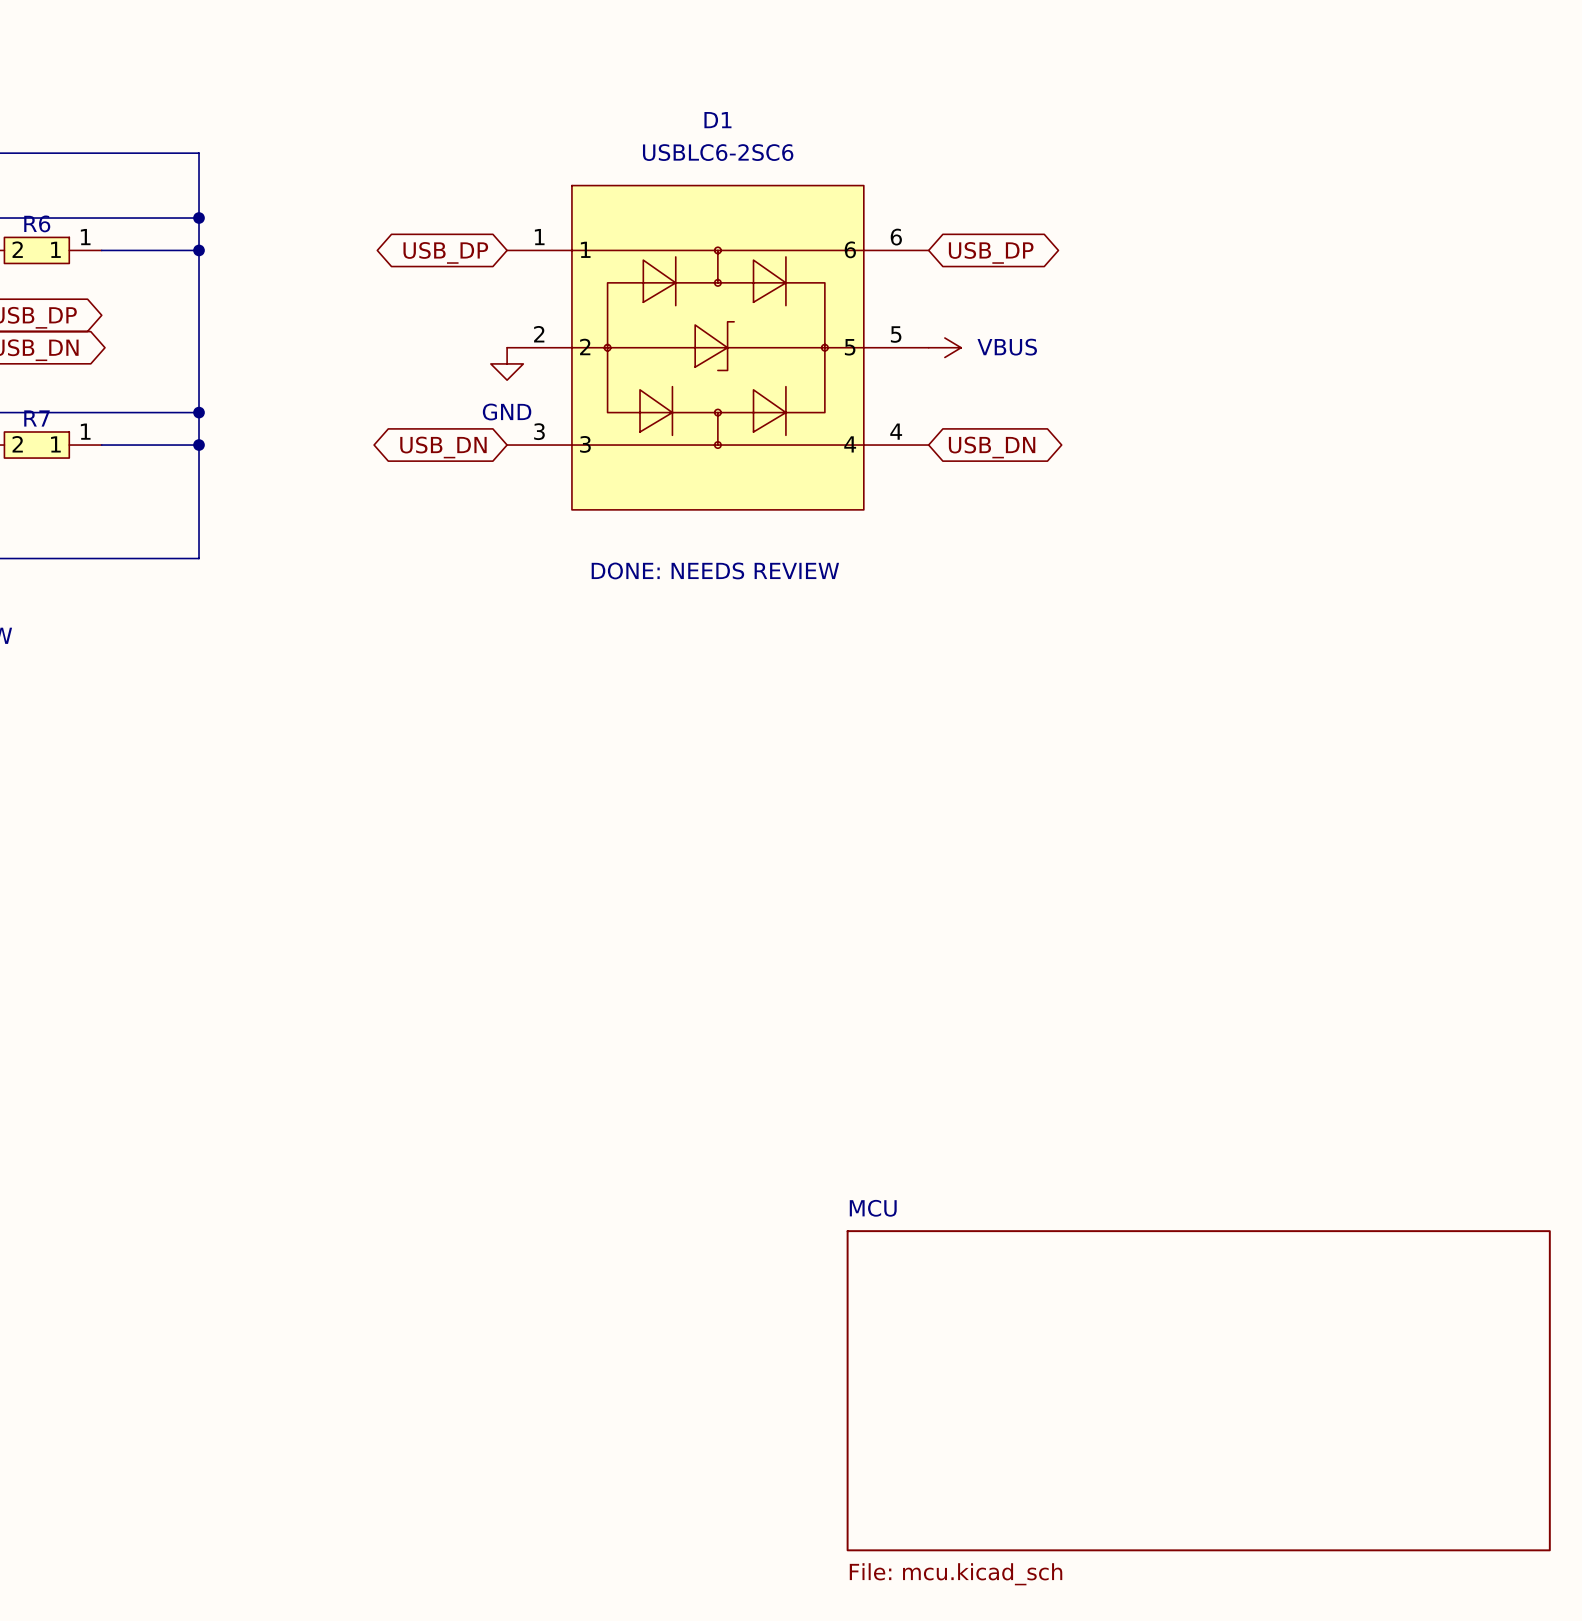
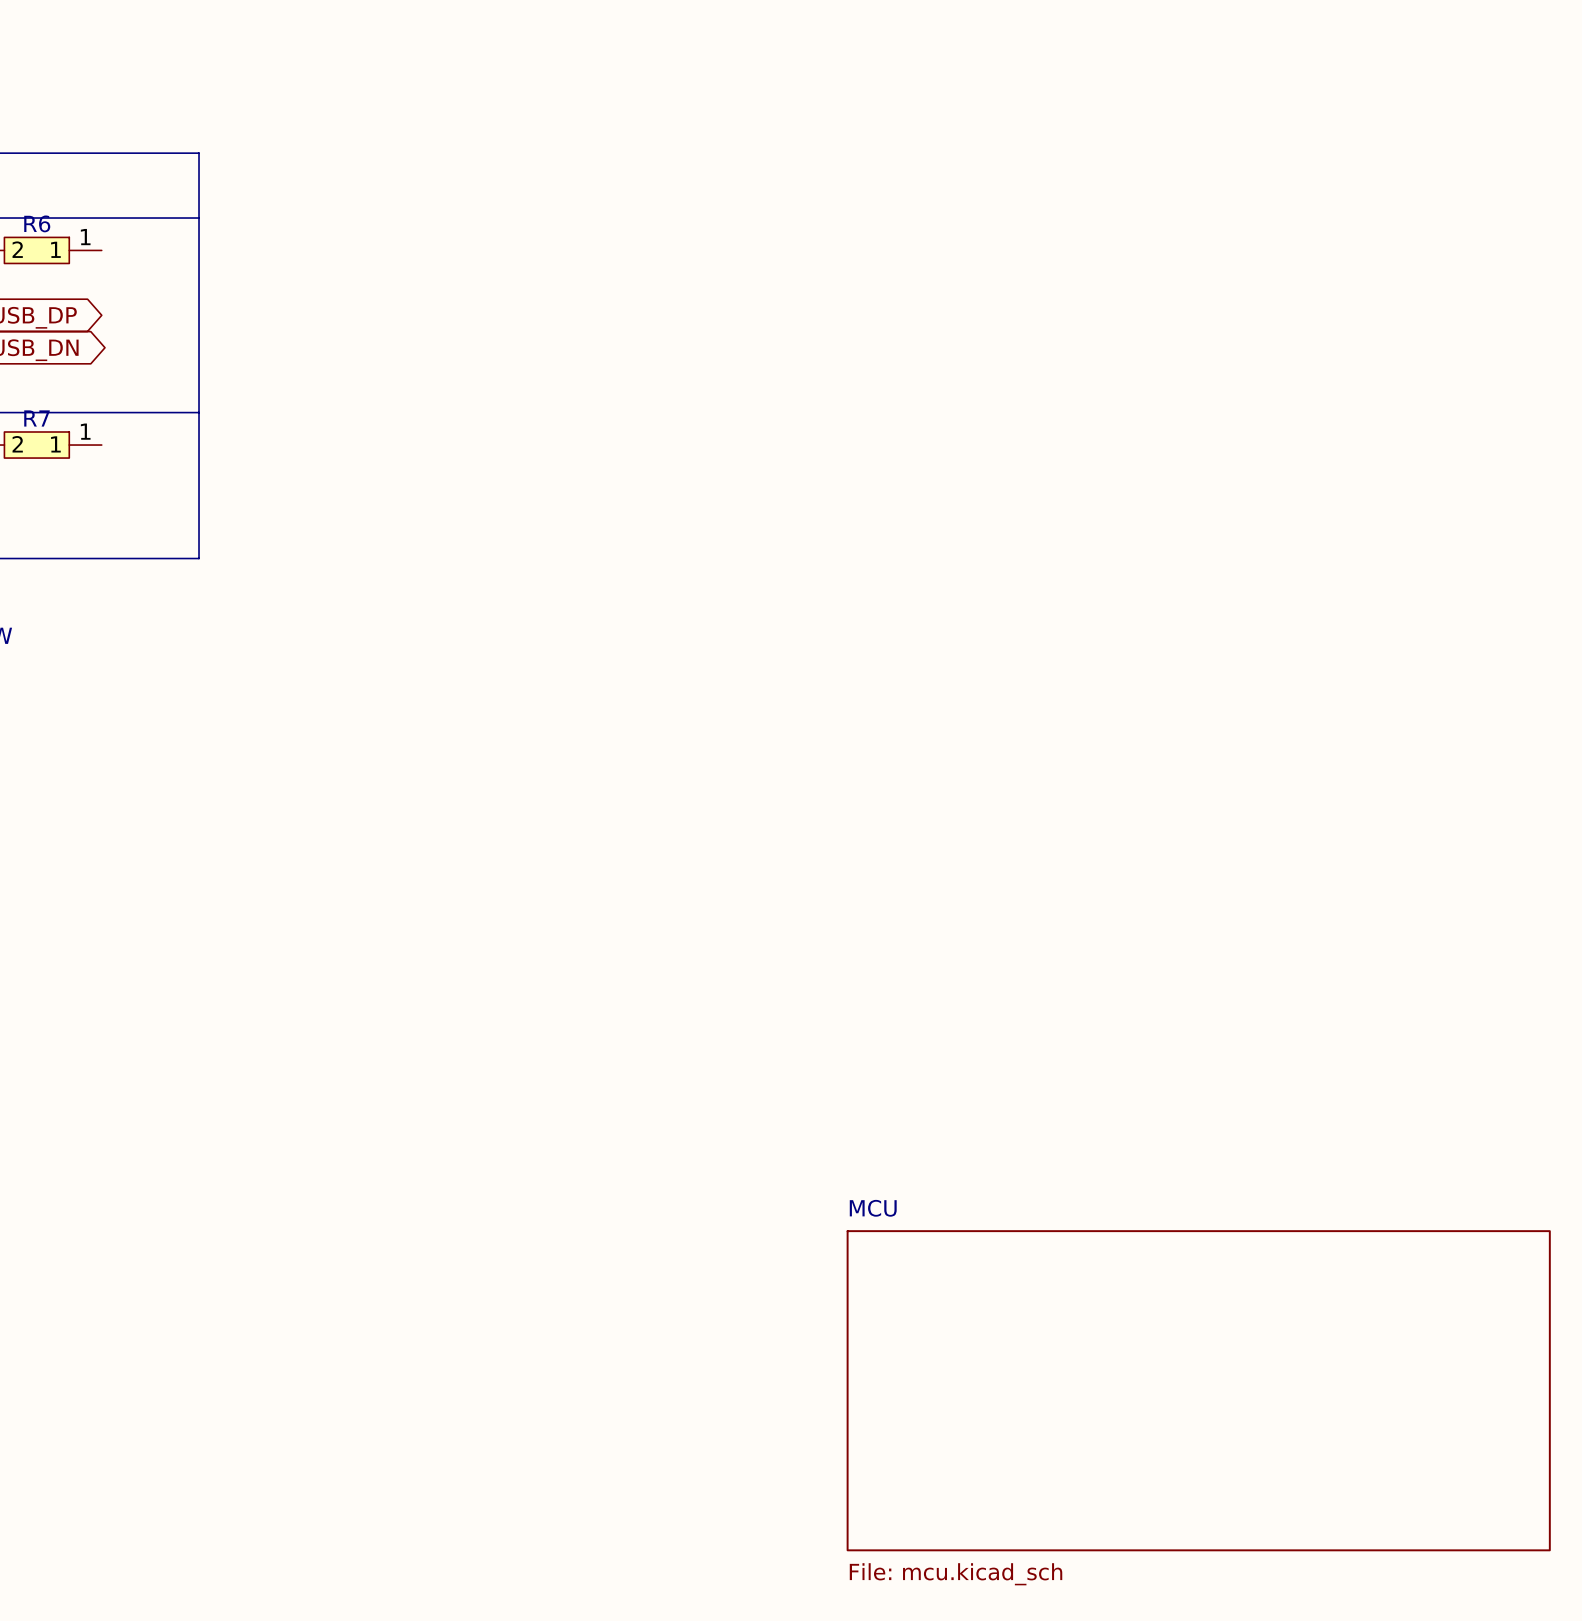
junction: (199, 218) -> none
wire: (101, 250) (199, 250) -> none
junction: (199, 250) -> none
global label: USB_DP (445, 252) -> none
global label: USB_DP (991, 252) -> none
D1: USBLC6-2SC6 (717, 347) -> none
power symbol: VBUS (944, 347) -> none
power symbol: GND (507, 363) -> none
junction: (199, 412) -> none
wire: (101, 445) (199, 445) -> none
junction: (199, 445) -> none
global label: USB_DN (443, 447) -> none
global label: USB_DN (992, 447) -> none
text: DONE: NEEDS REVIEW (715, 570) -> none

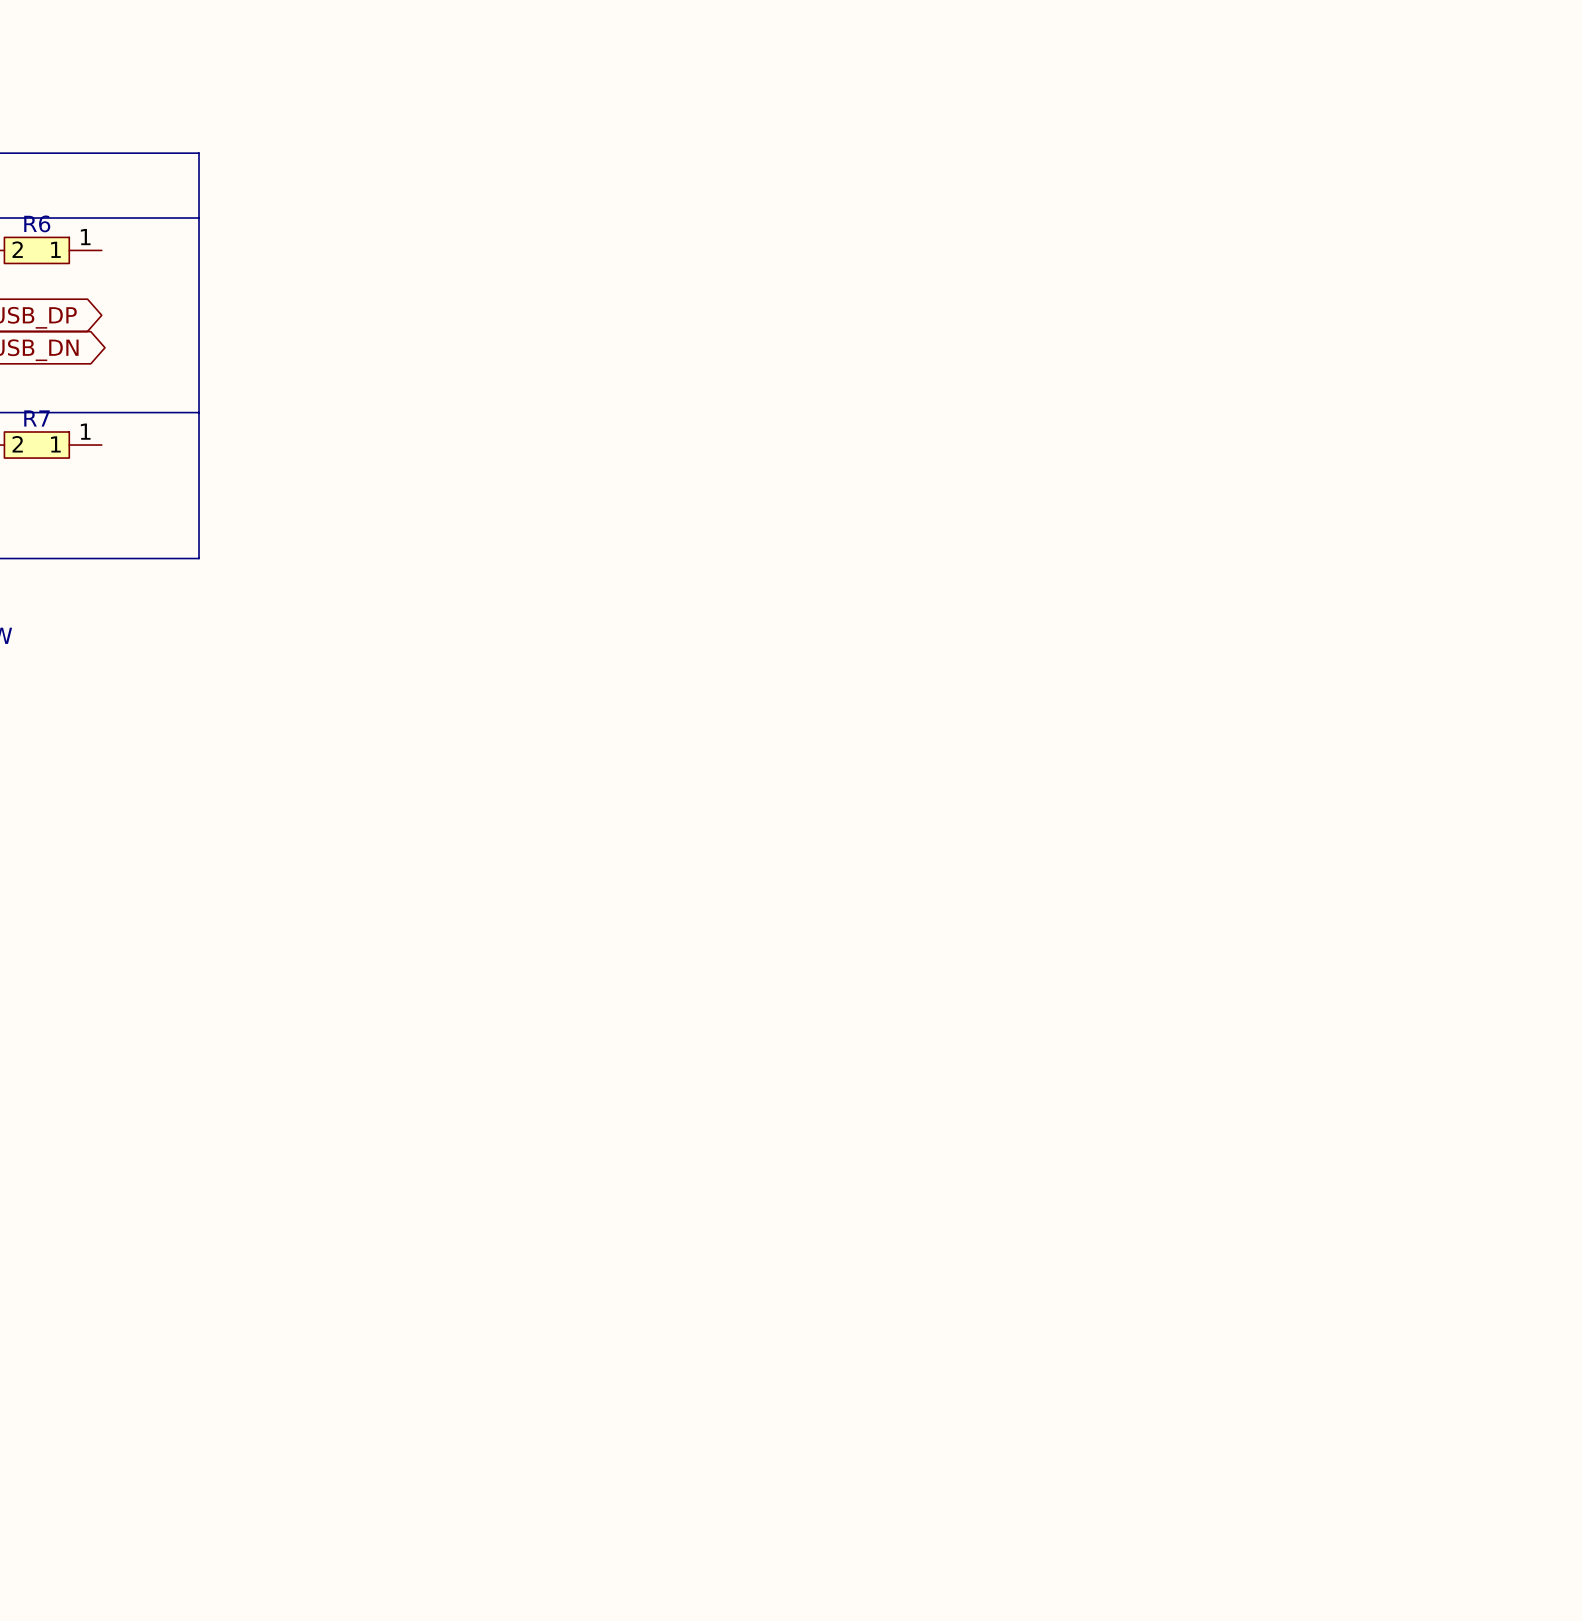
sheet MCU: File: mcu.kicad_sch (1198, 1390) -> none

